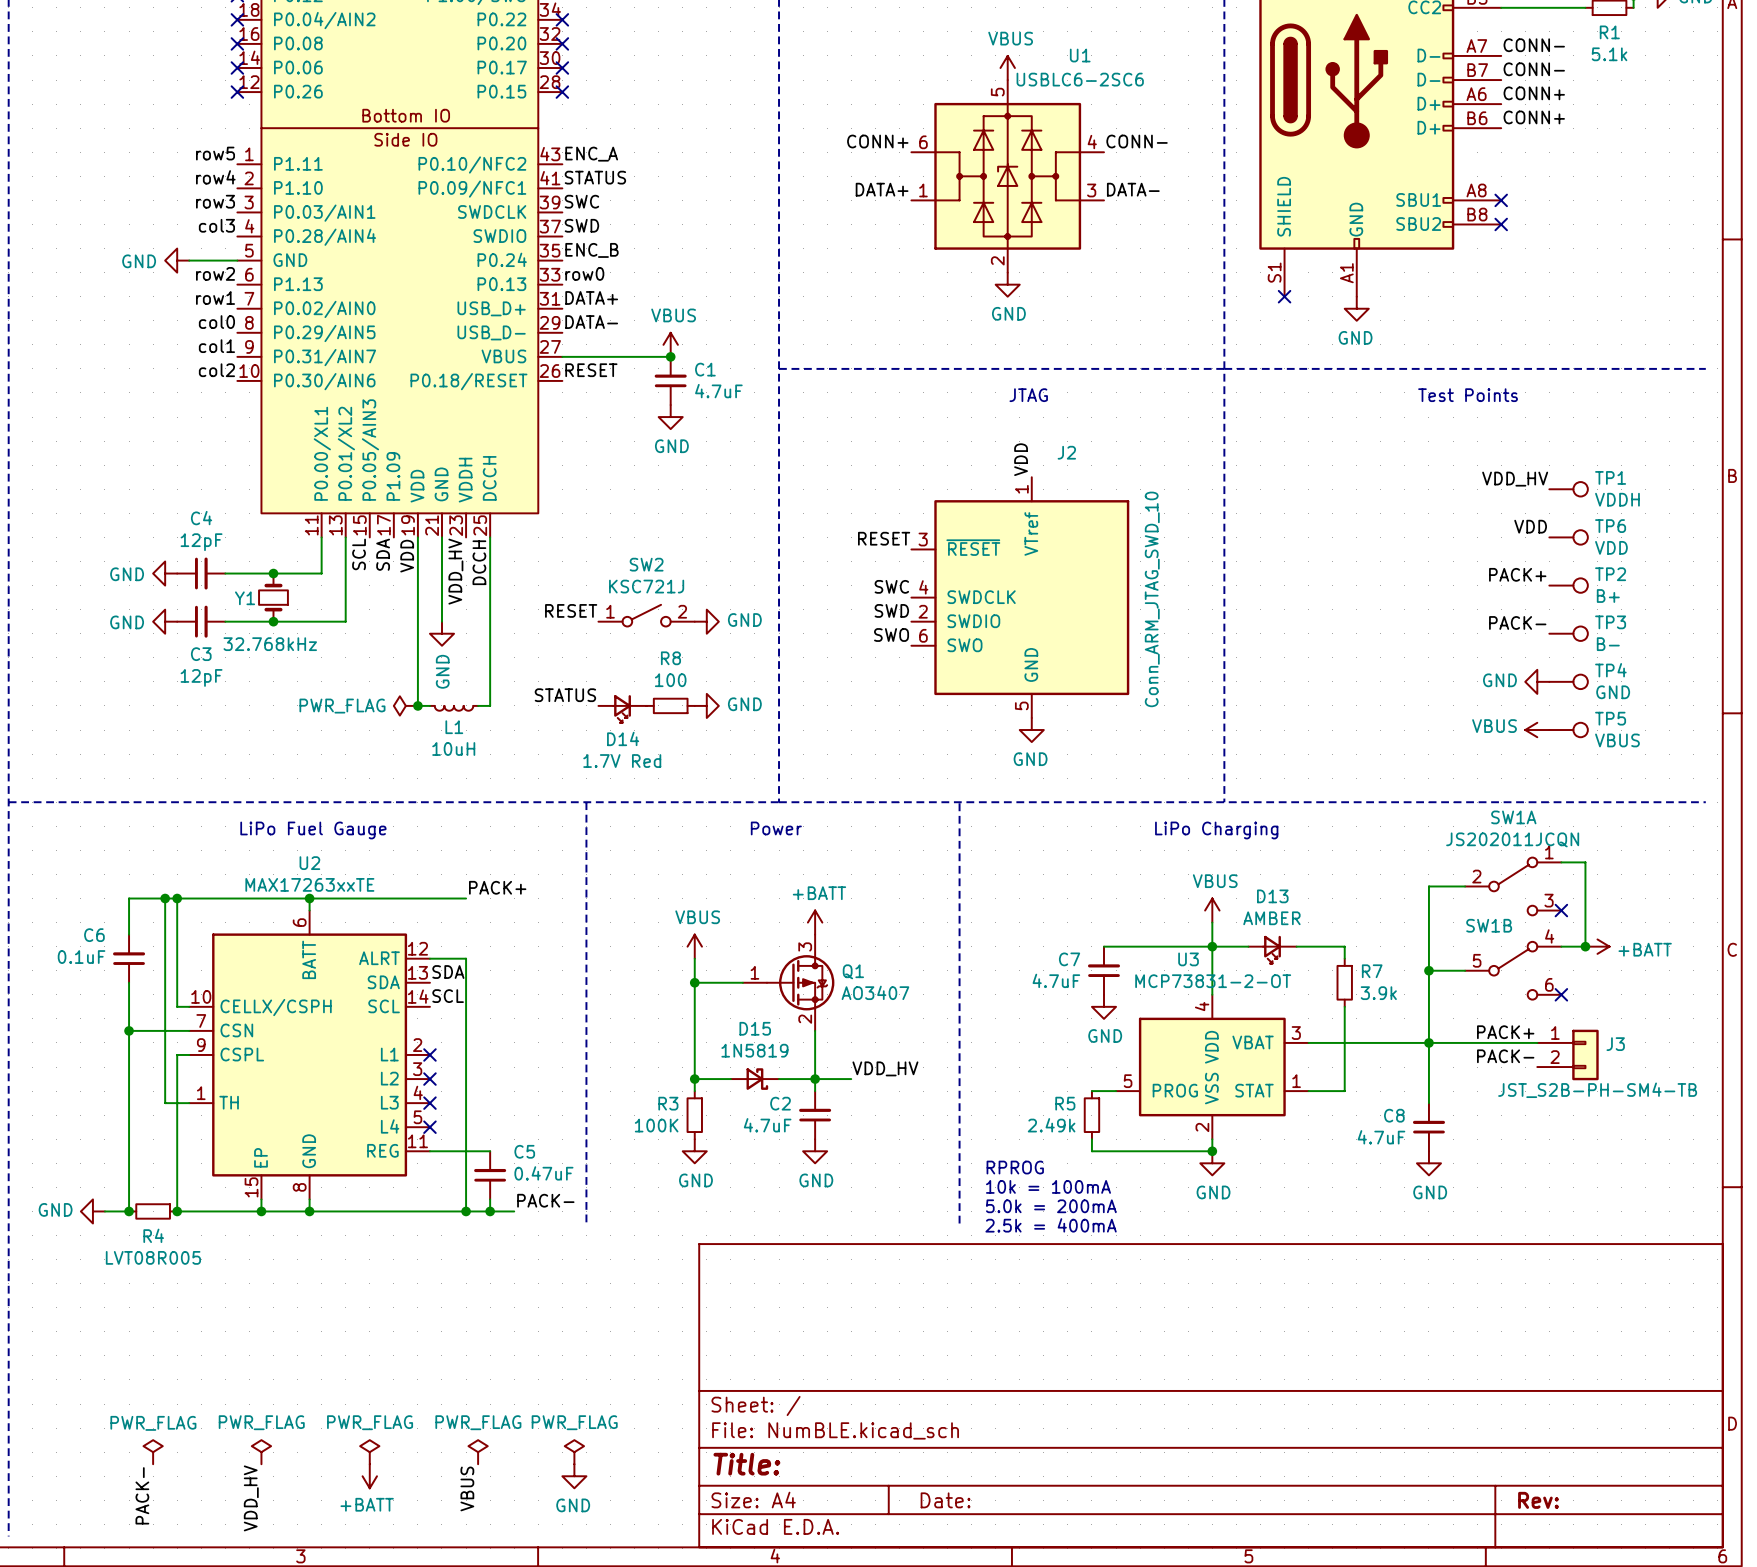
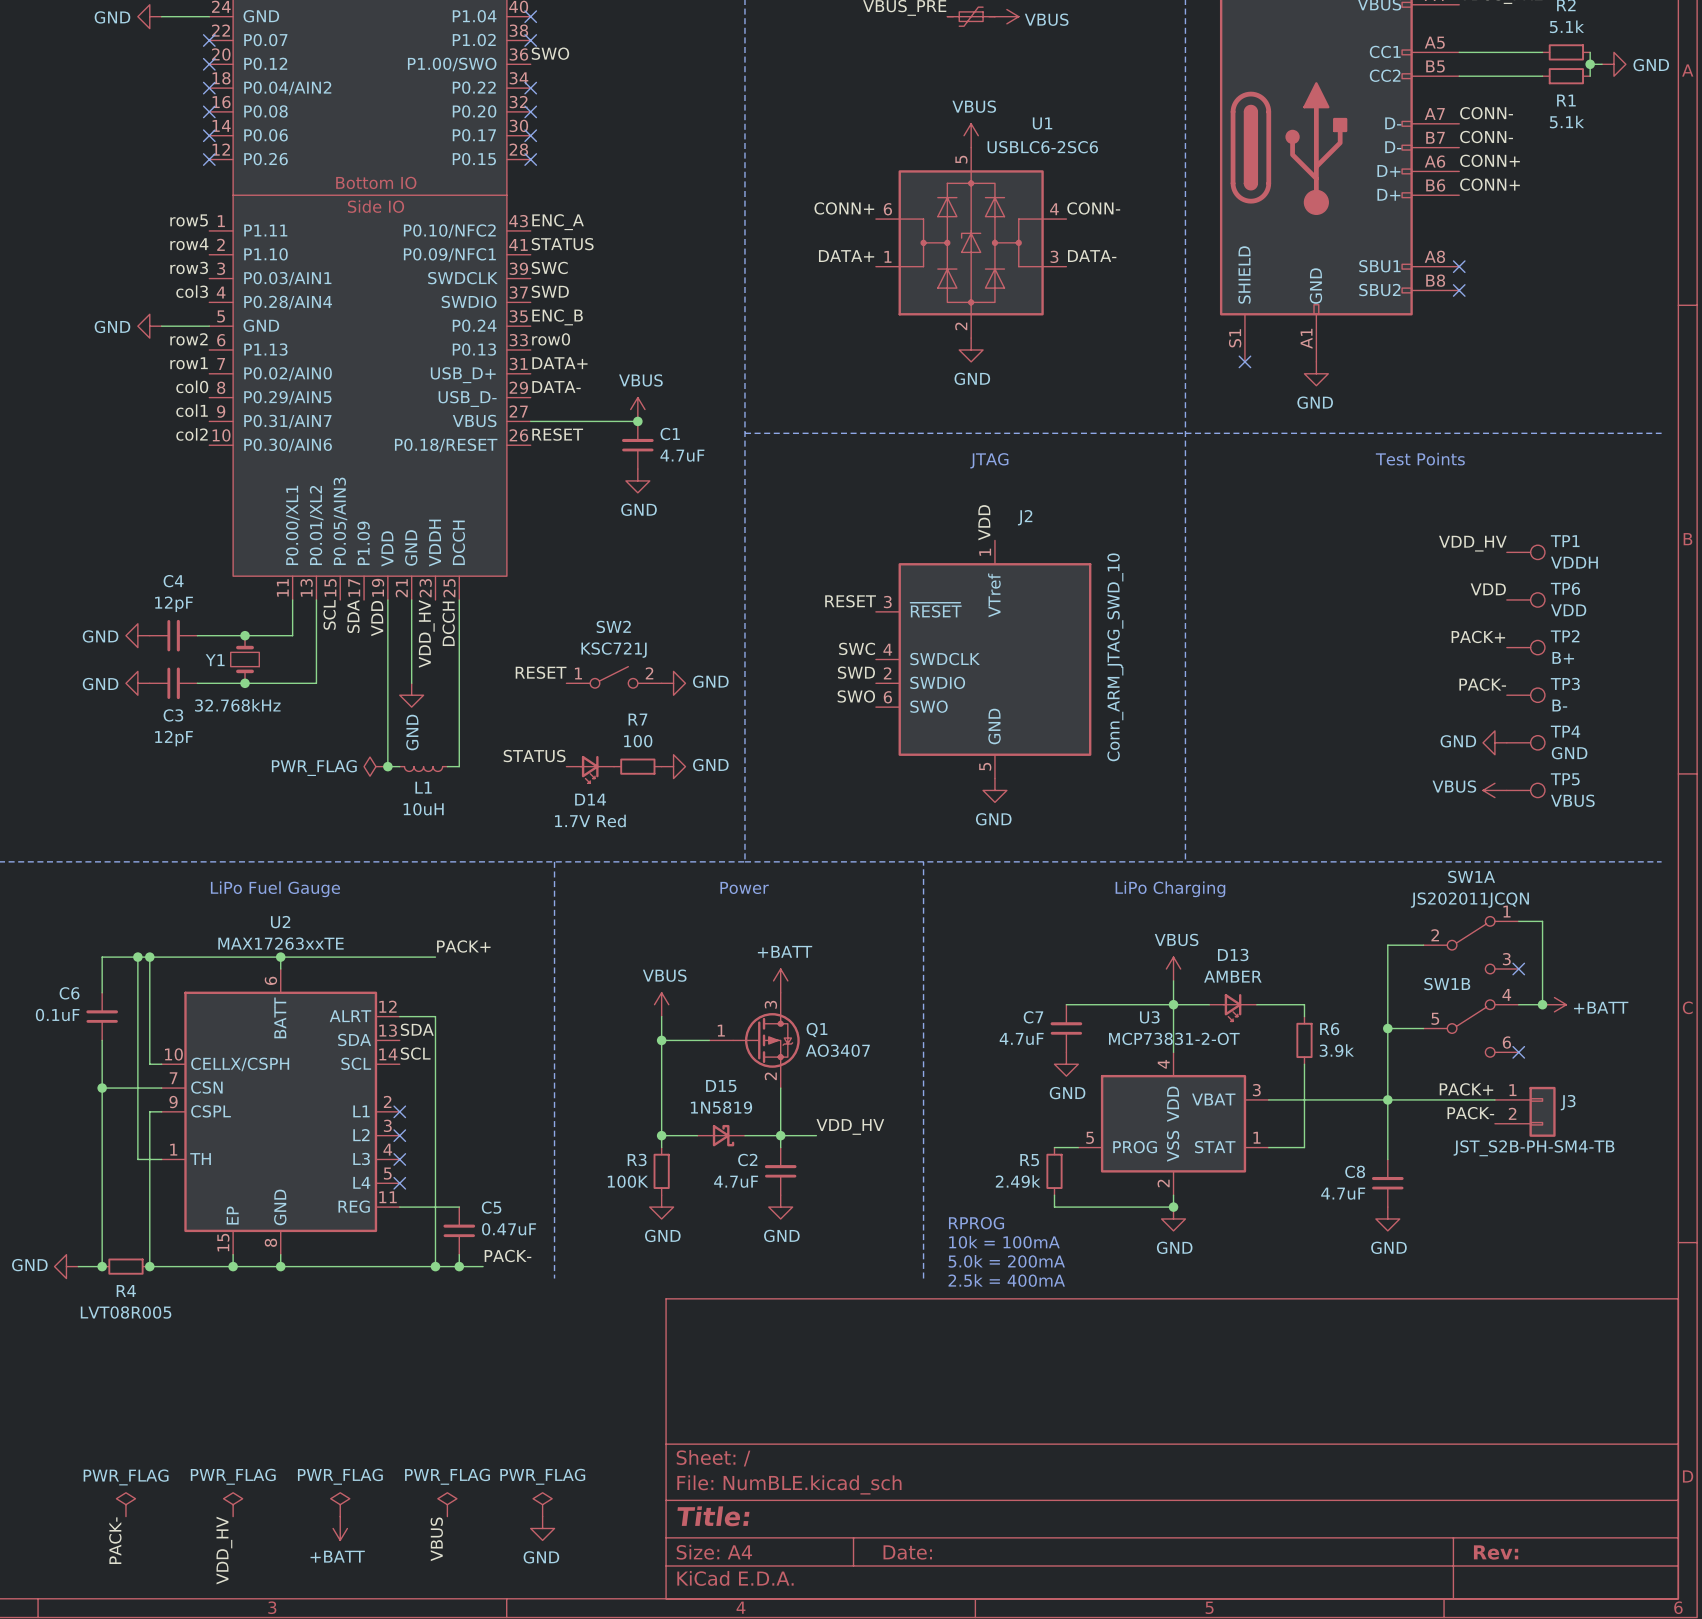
R8 name: R8 (670, 658) -> R7 (637, 719)
R7 name: R7 (1372, 971) -> R6 (1329, 1029)

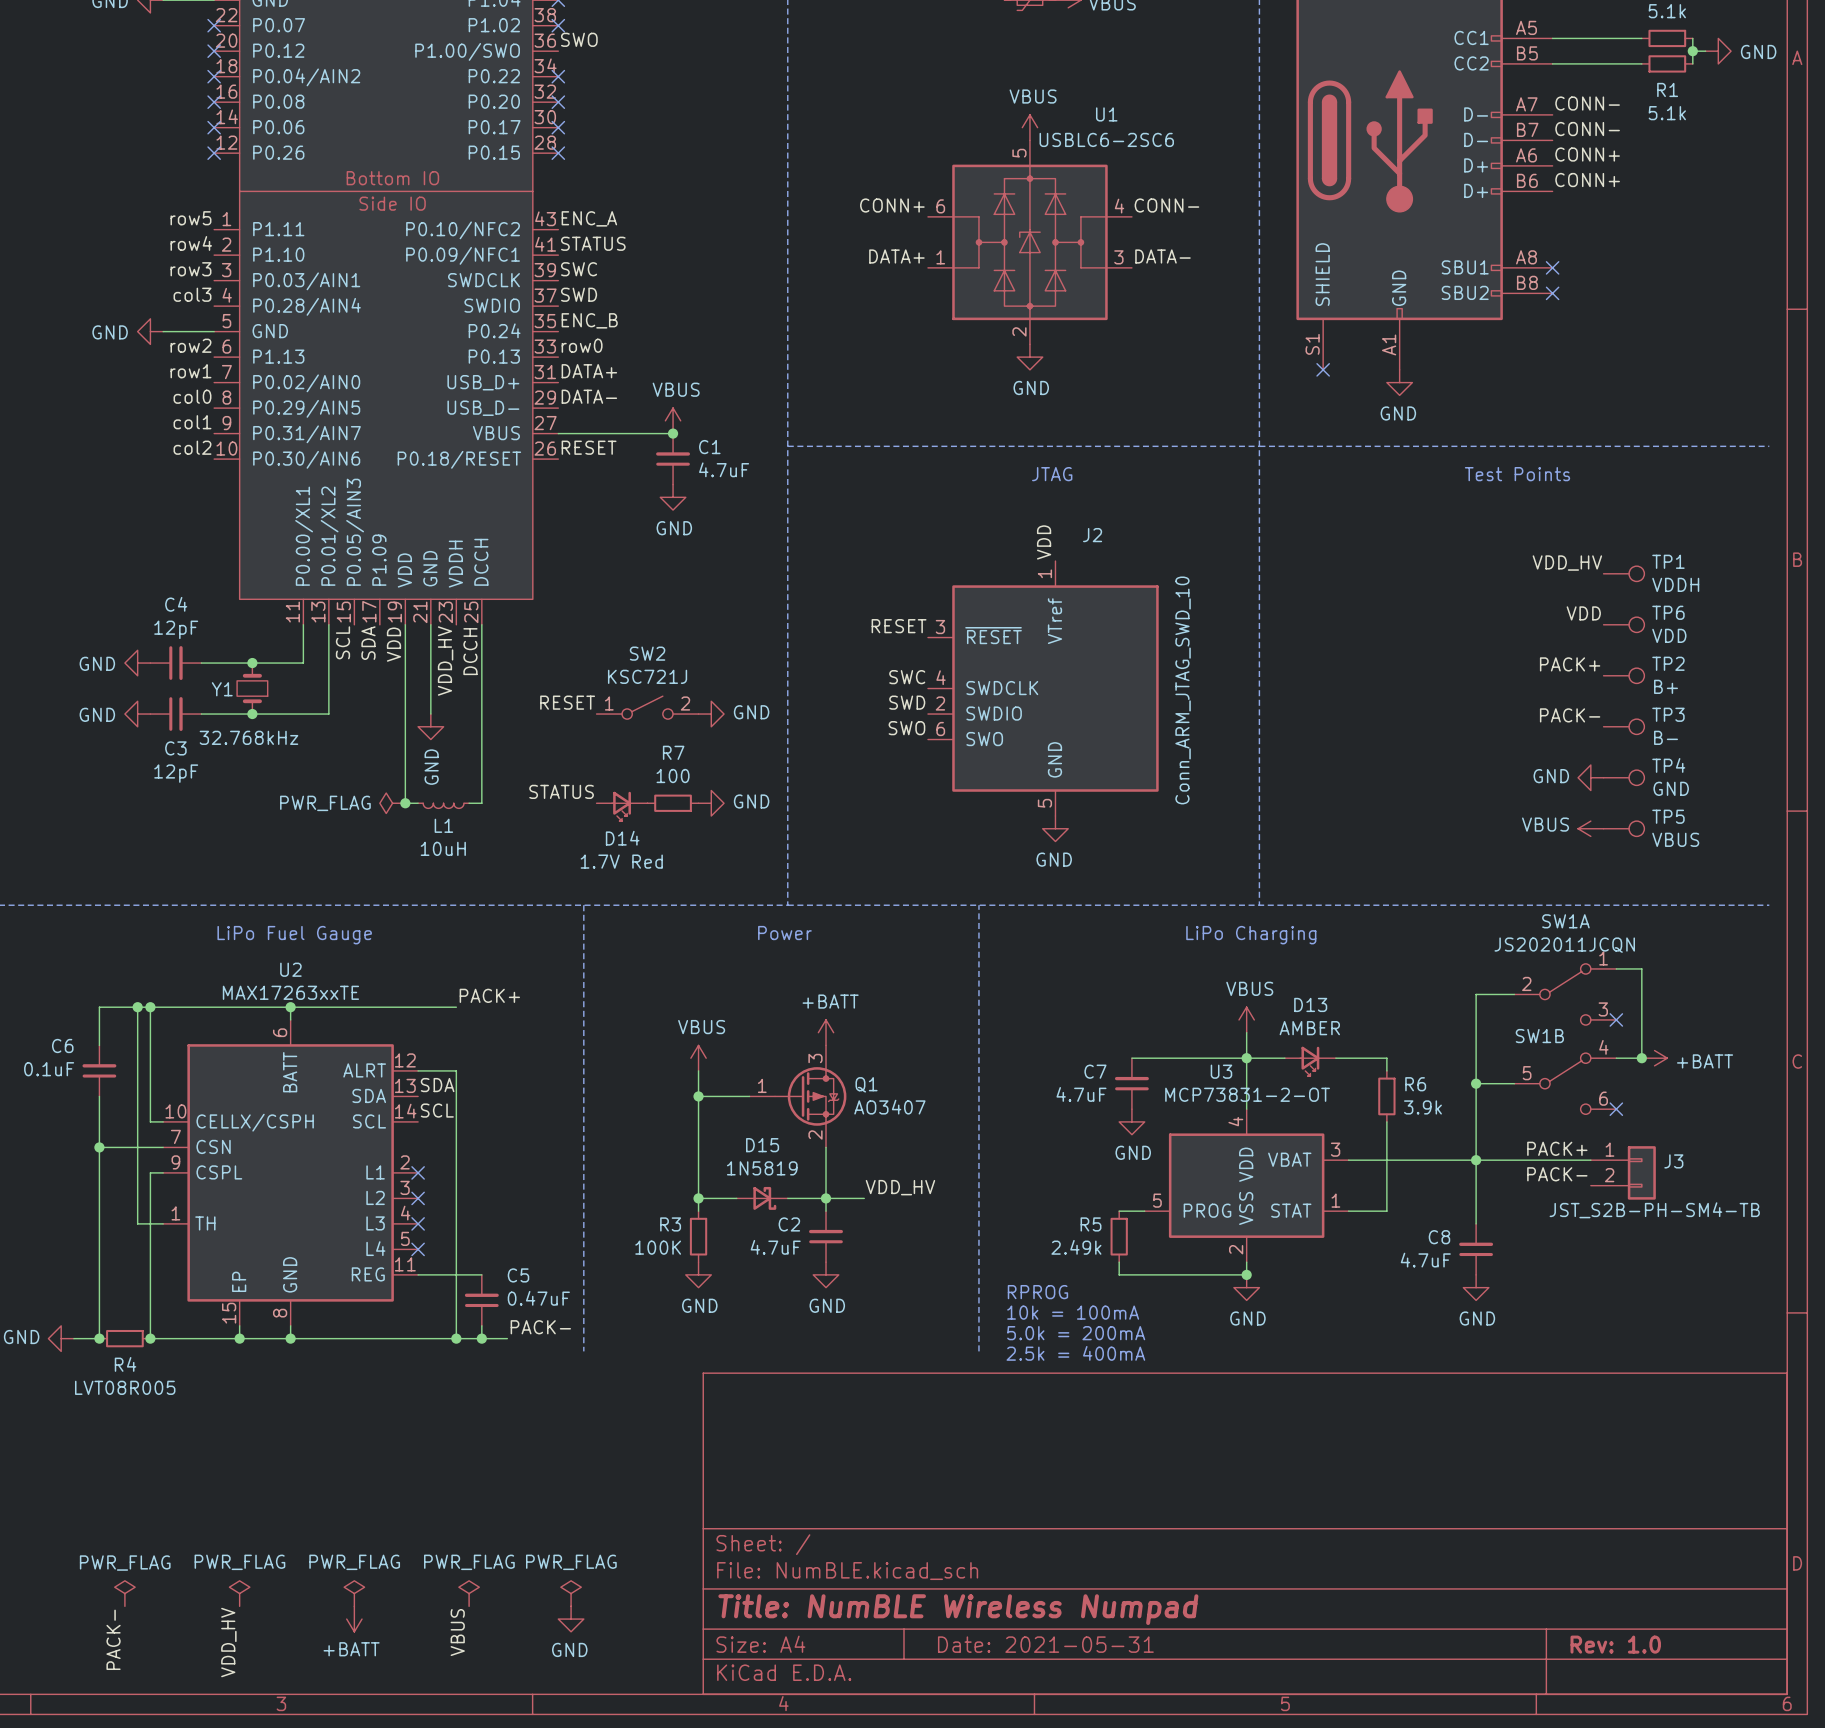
title block: Title: (713, 1516) -> Title: NumBLE Wireless Numpad (958, 1609)
title block: Date: (907, 1552) -> Date: 2021-05-31 (1045, 1644)
title block: Rev: (1496, 1552) -> Rev: 1.0 (1615, 1644)

